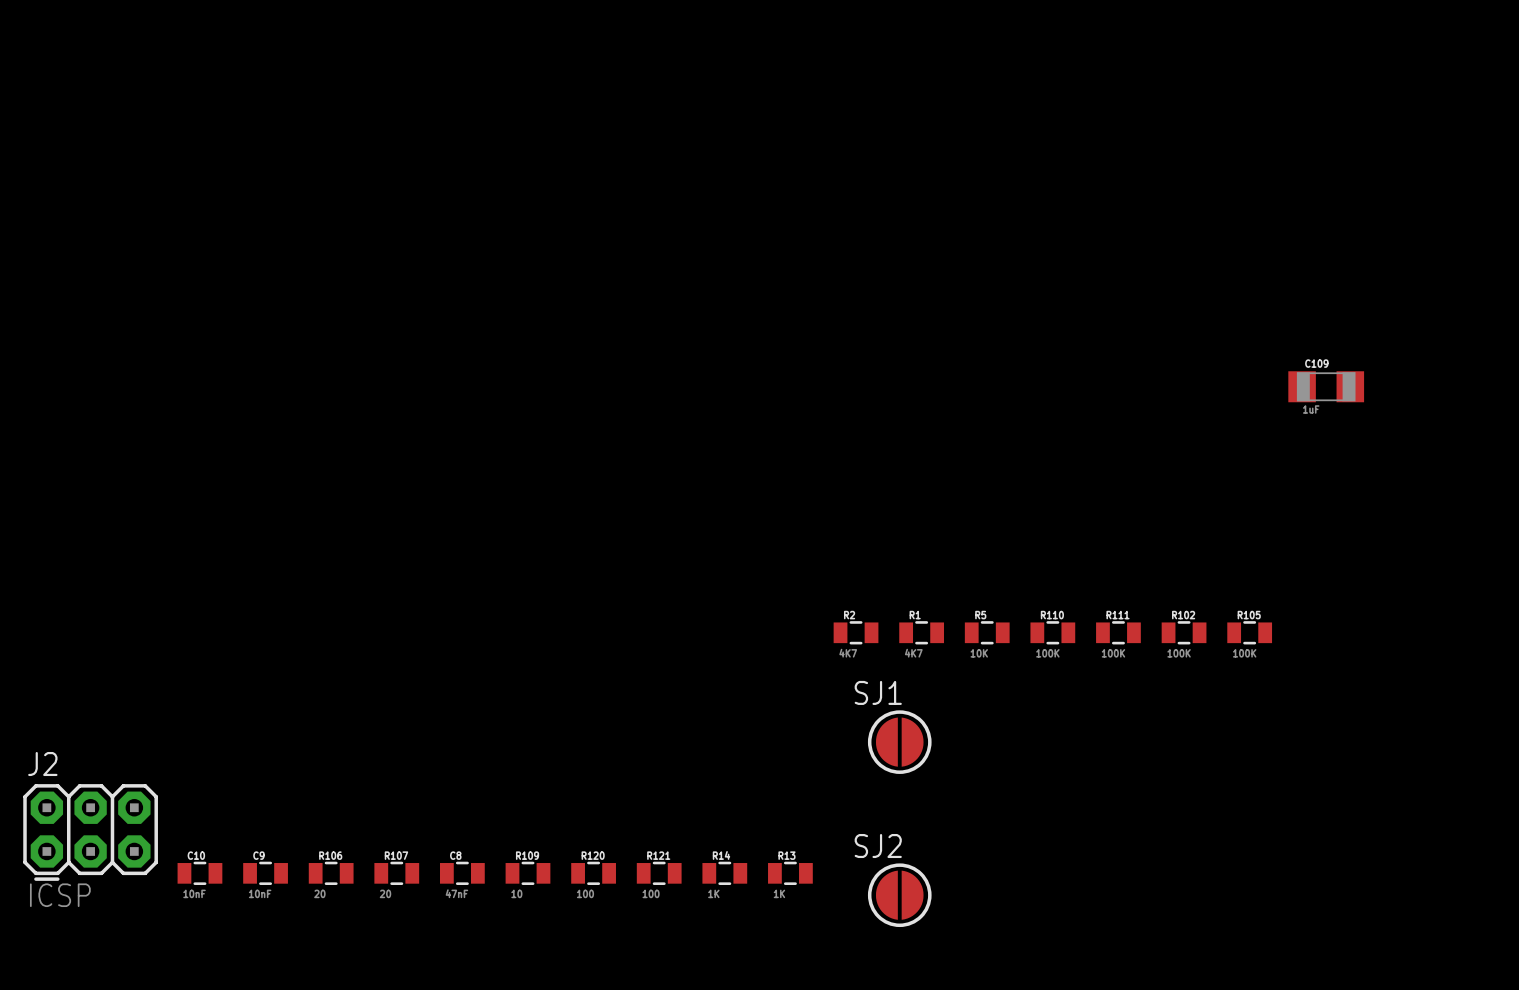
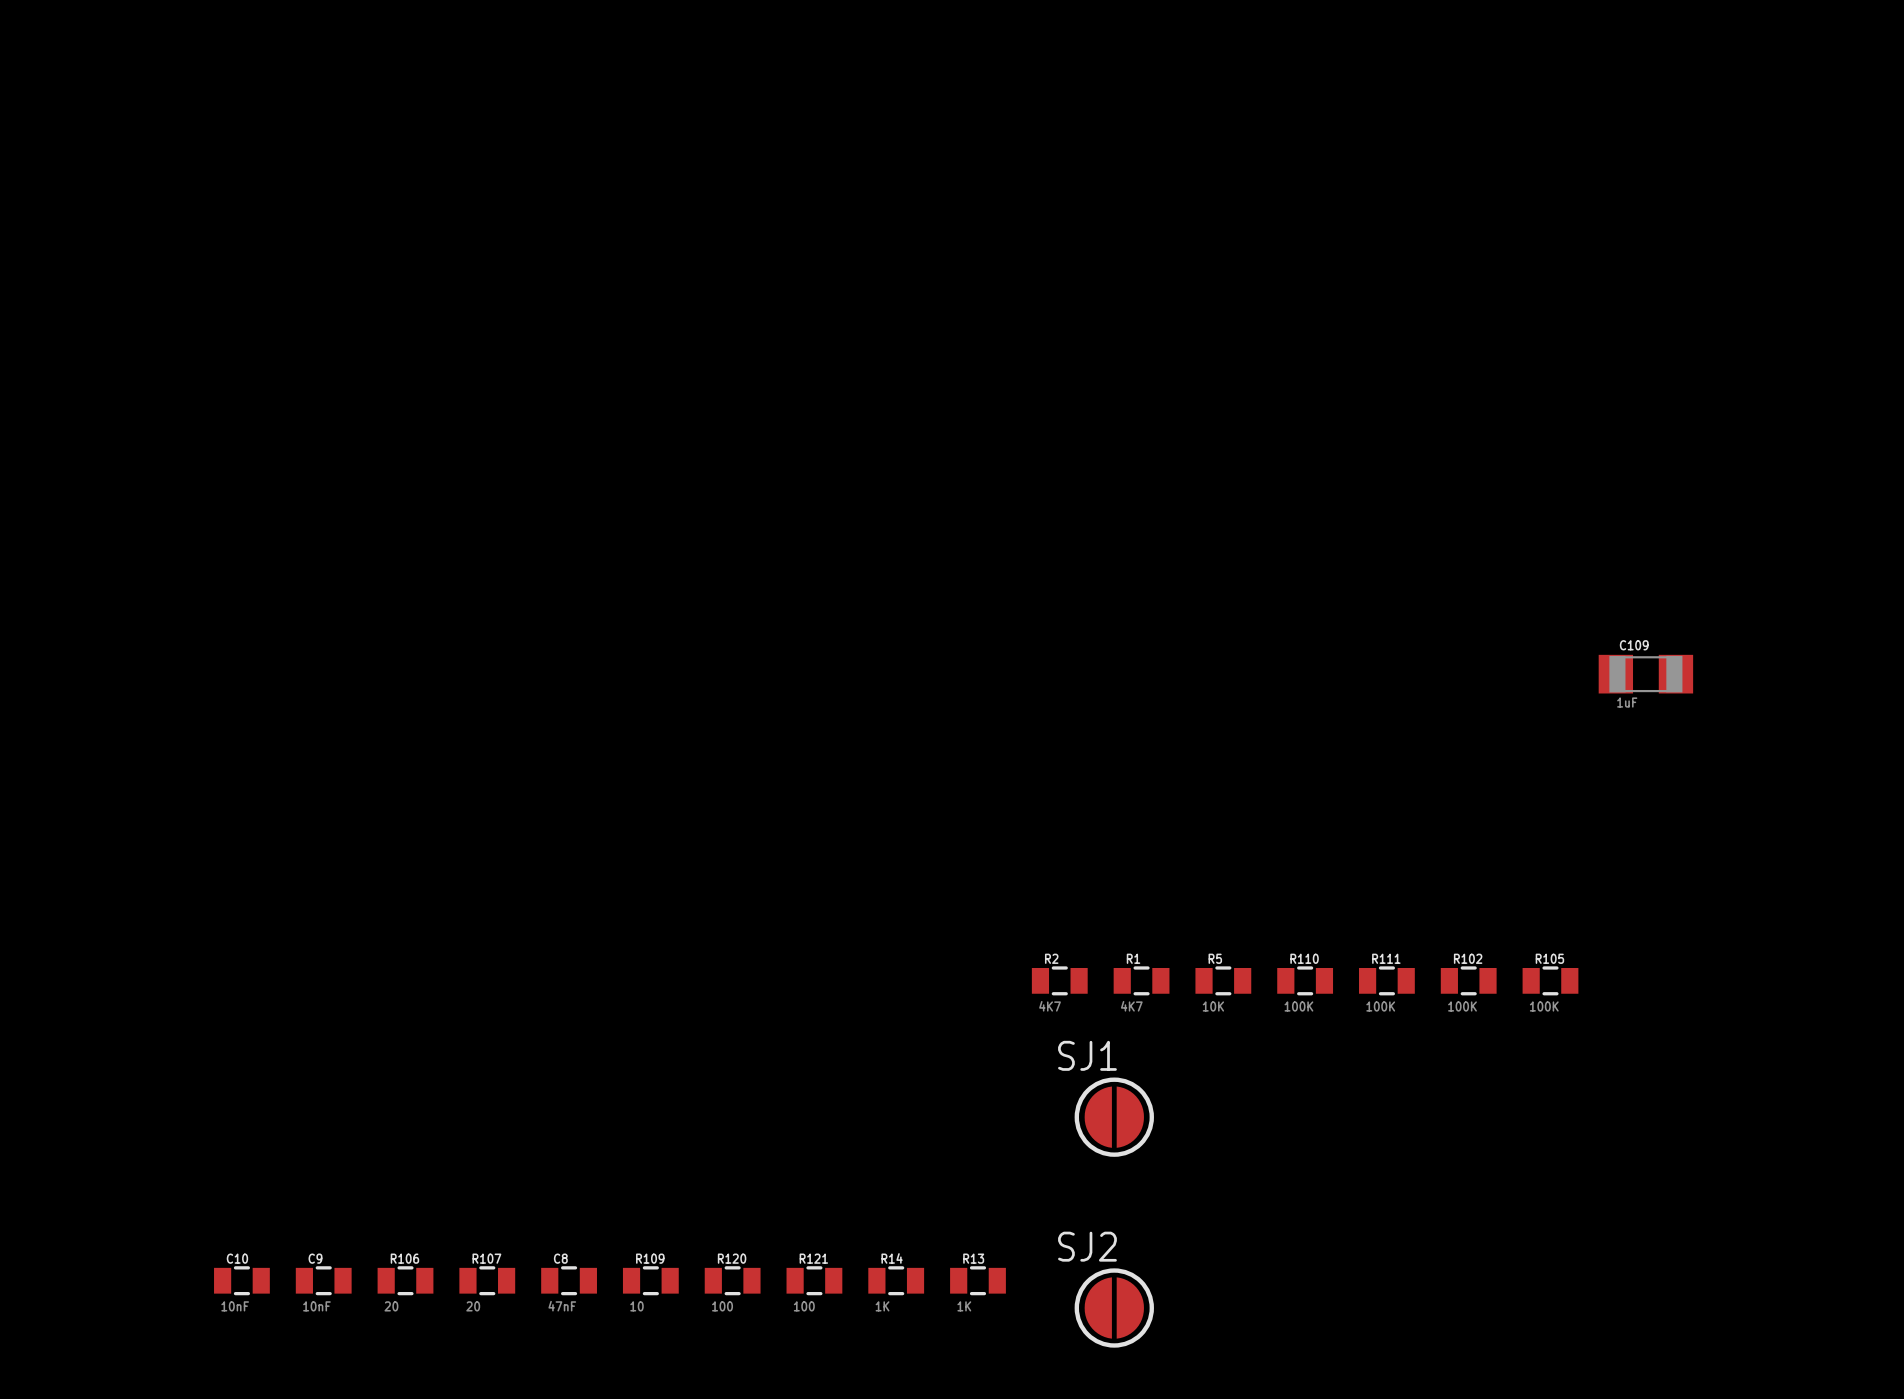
J2: ICSP (90, 832) -> none

